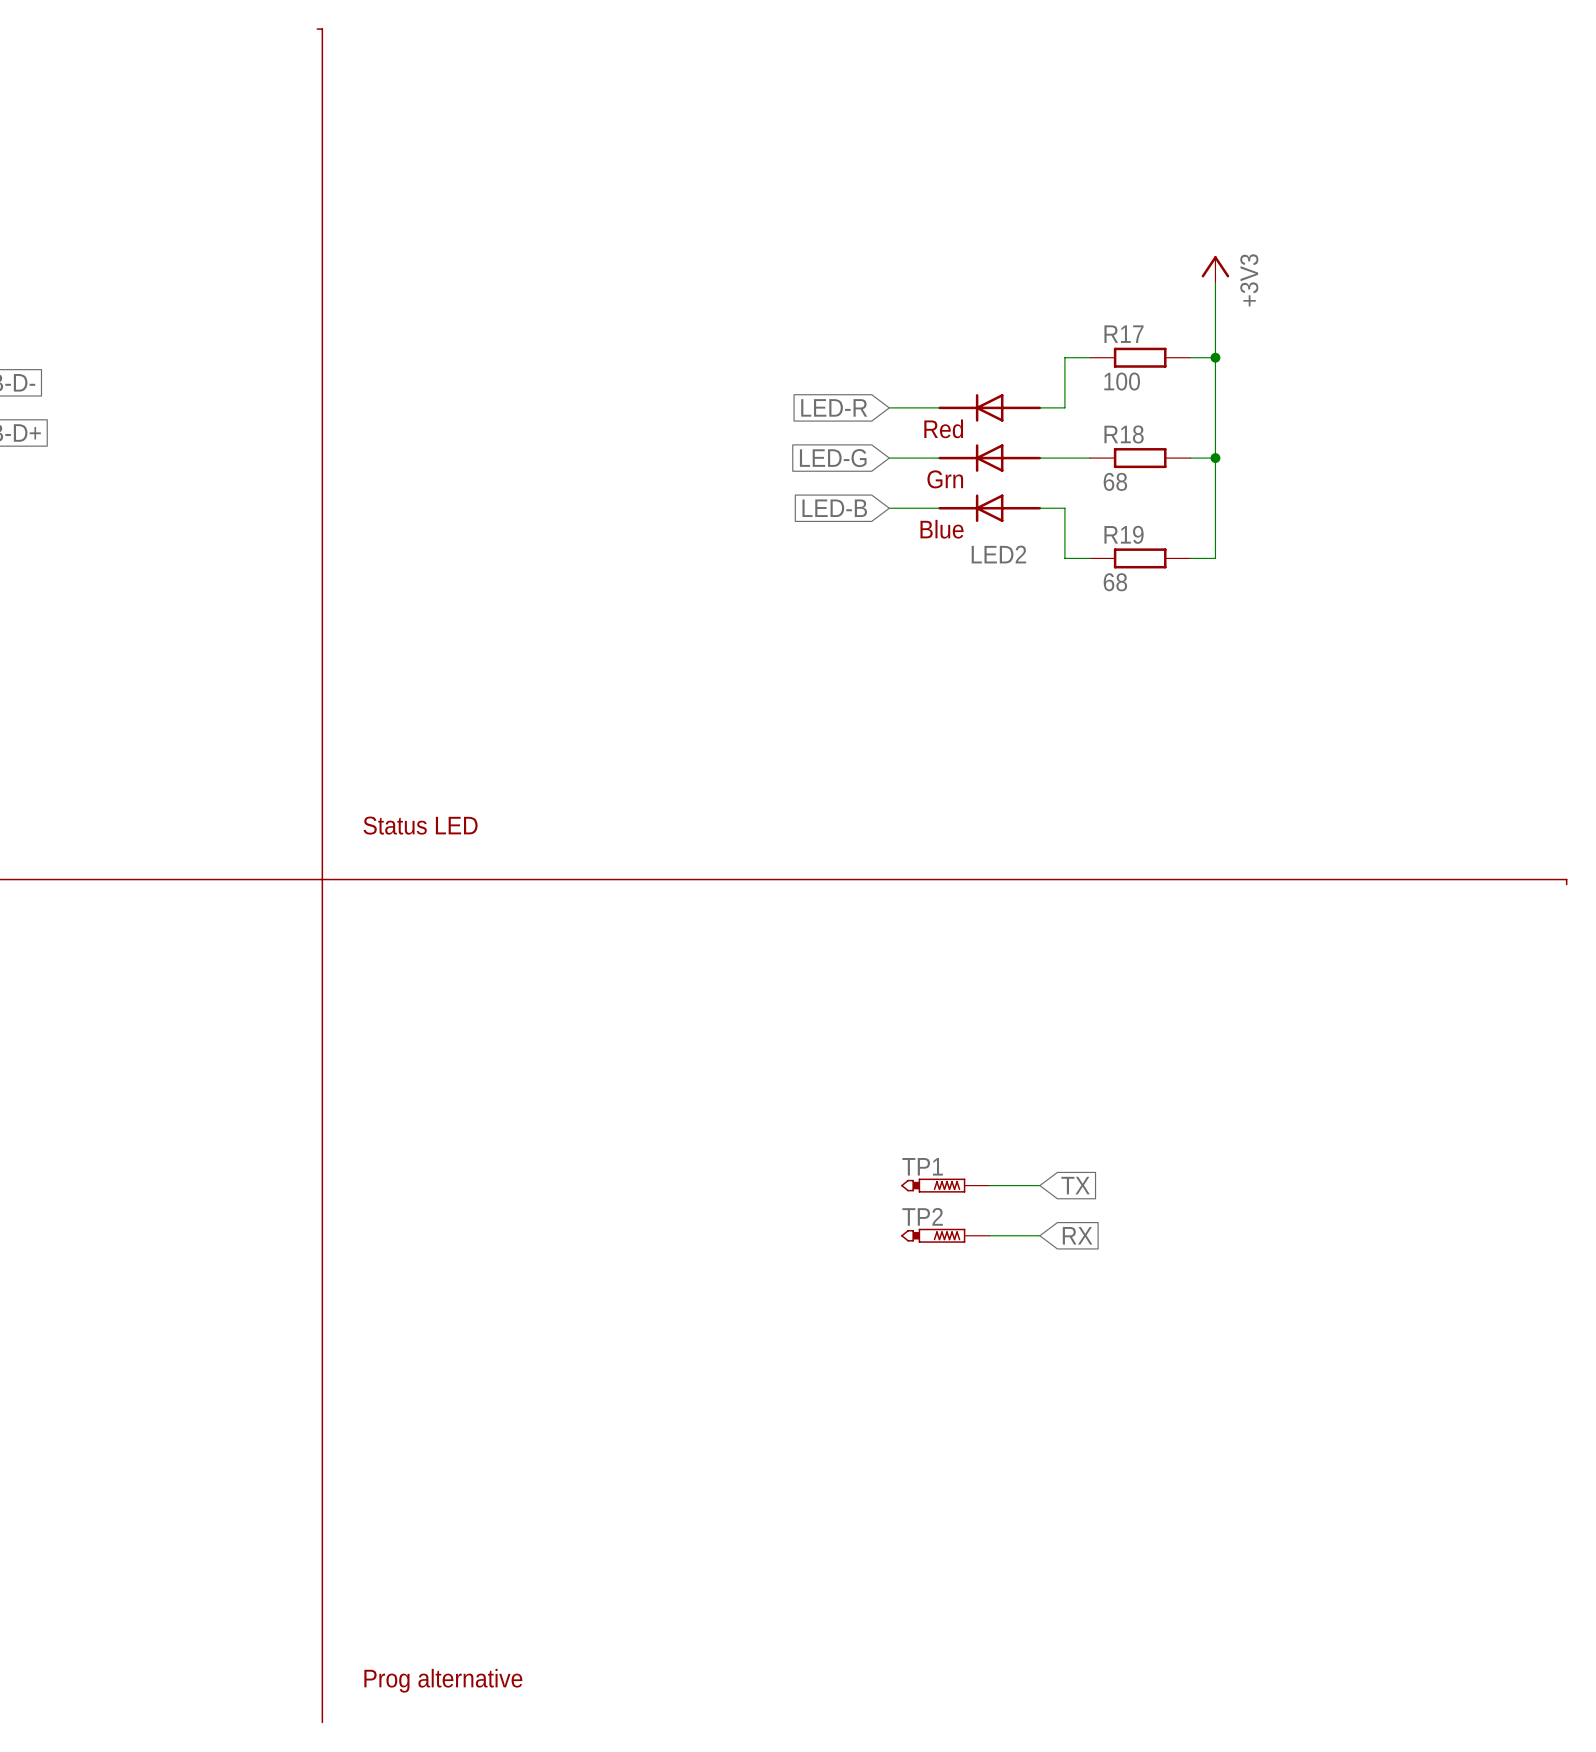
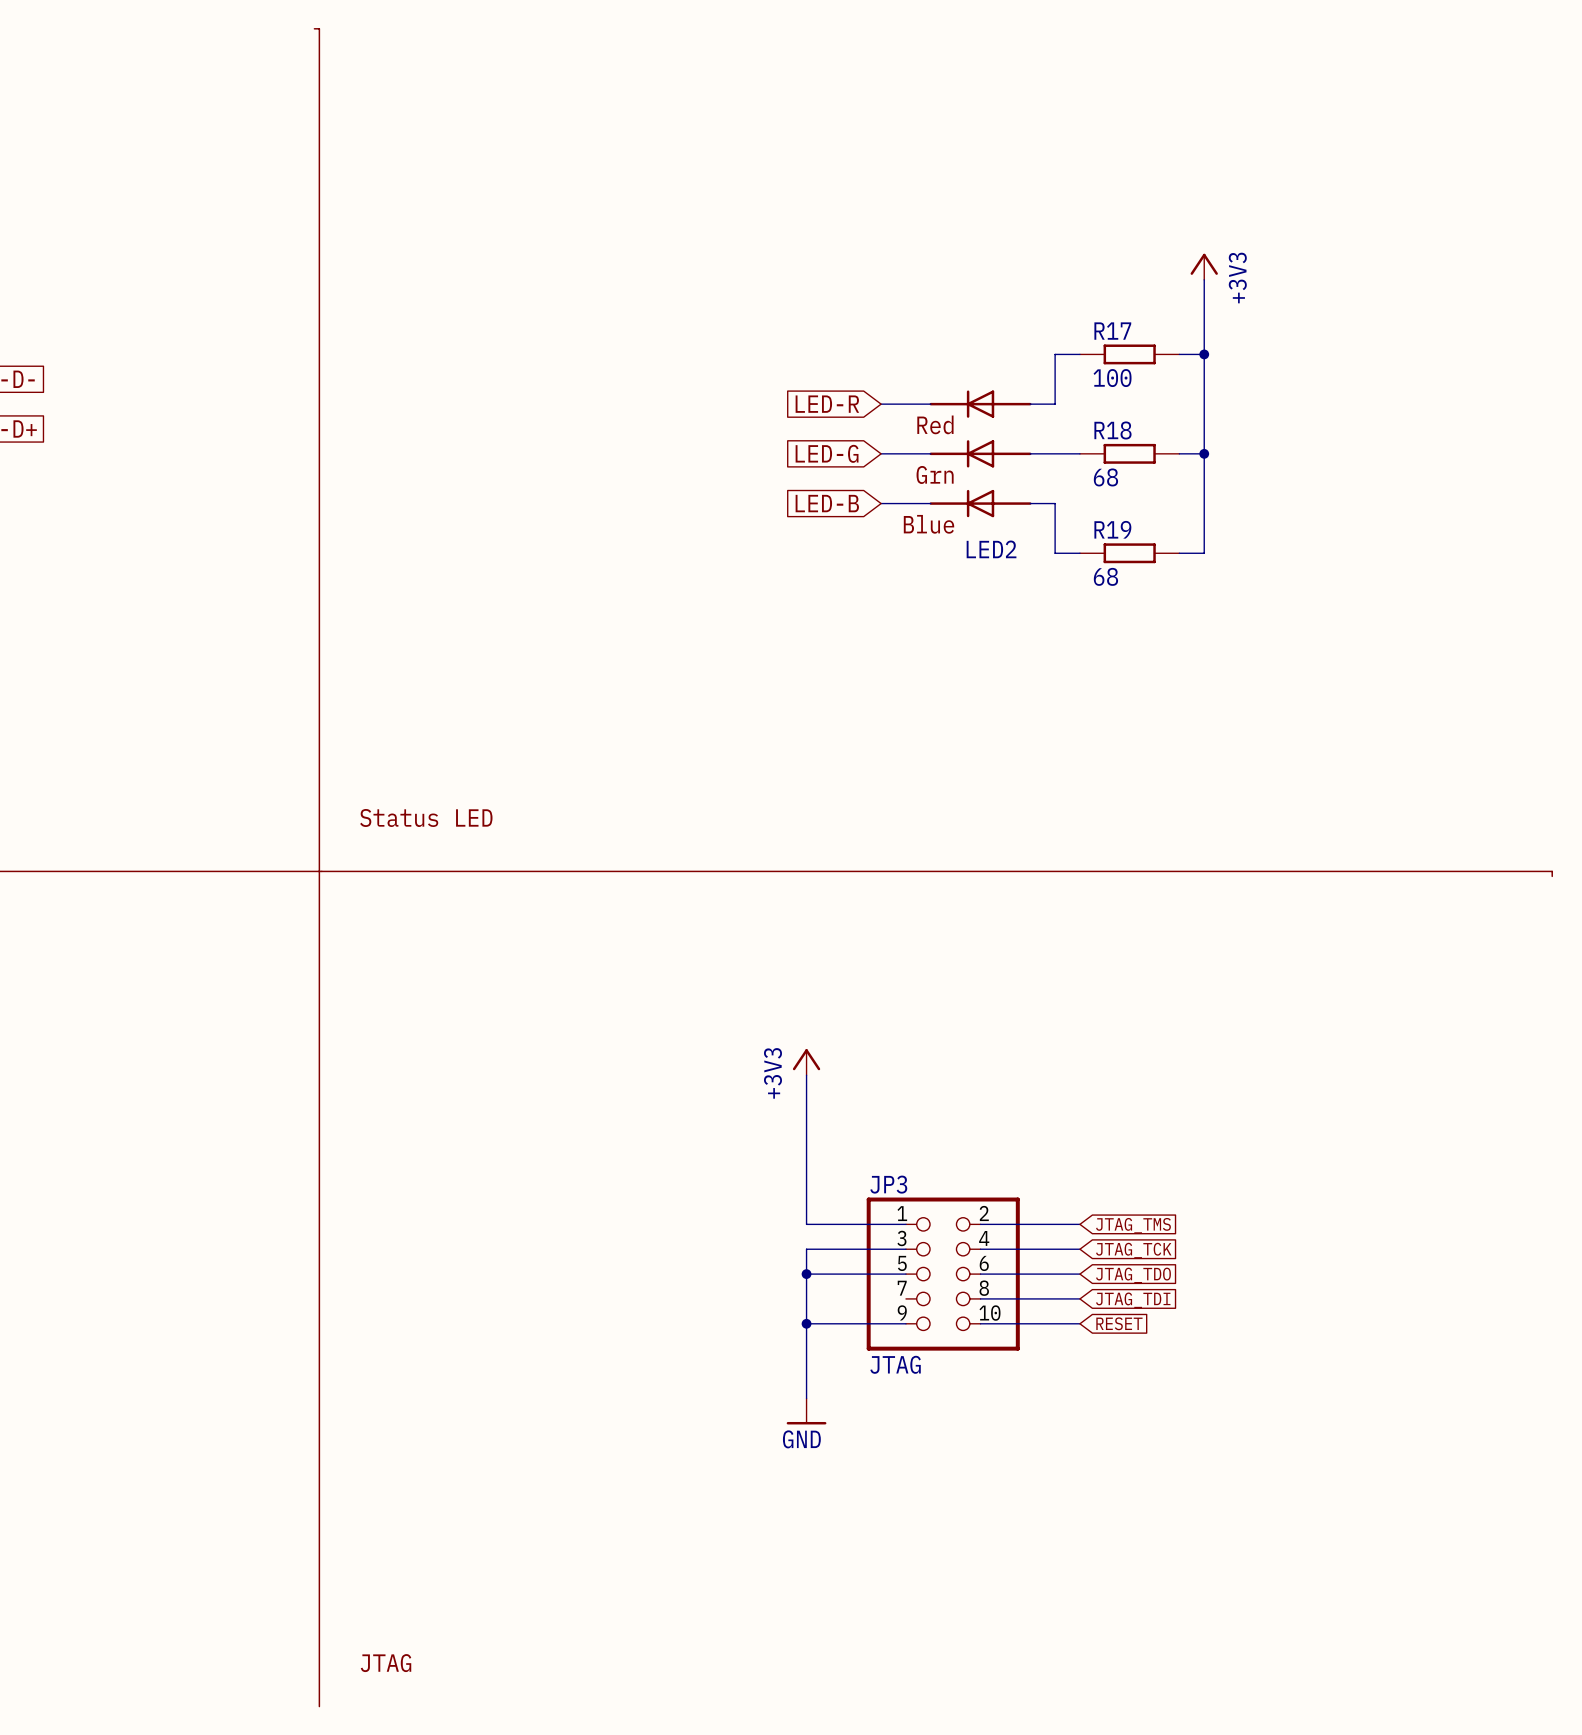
power symbol: none -> +3V3 (806, 1062)
wire: none -> (806, 1075) (806, 1224) (905, 1224)
TP1: (945, 1185) -> none
wire: (989, 1185) (1039, 1185) -> (1030, 1224) (1079, 1224)
global label: TX (1075, 1185) -> none
TP2: (945, 1235) -> none
global label: RX (1077, 1235) -> none
global label: none -> JTAG_TMS (1133, 1225)
wire: none -> (905, 1249) (806, 1249) (806, 1398)
wire: none -> (980, 1249) (1079, 1249)
global label: none -> JTAG_TCK (1133, 1250)
wire: none -> (806, 1274) (905, 1274)
junction: none -> (806, 1274)
JP3: none -> JTAG (943, 1274)
wire: none -> (980, 1274) (1079, 1274)
global label: none -> JTAG_TDO (1133, 1275)
wire: none -> (980, 1298) (1079, 1298)
global label: none -> JTAG_TDI (1133, 1300)
wire: none -> (806, 1323) (905, 1323)
junction: none -> (806, 1323)
wire: none -> (980, 1323) (1079, 1323)
global label: none -> RESET (1119, 1323)
power symbol: none -> GND (806, 1411)
text: Prog alternative (443, 1680) -> JTAG (386, 1663)

